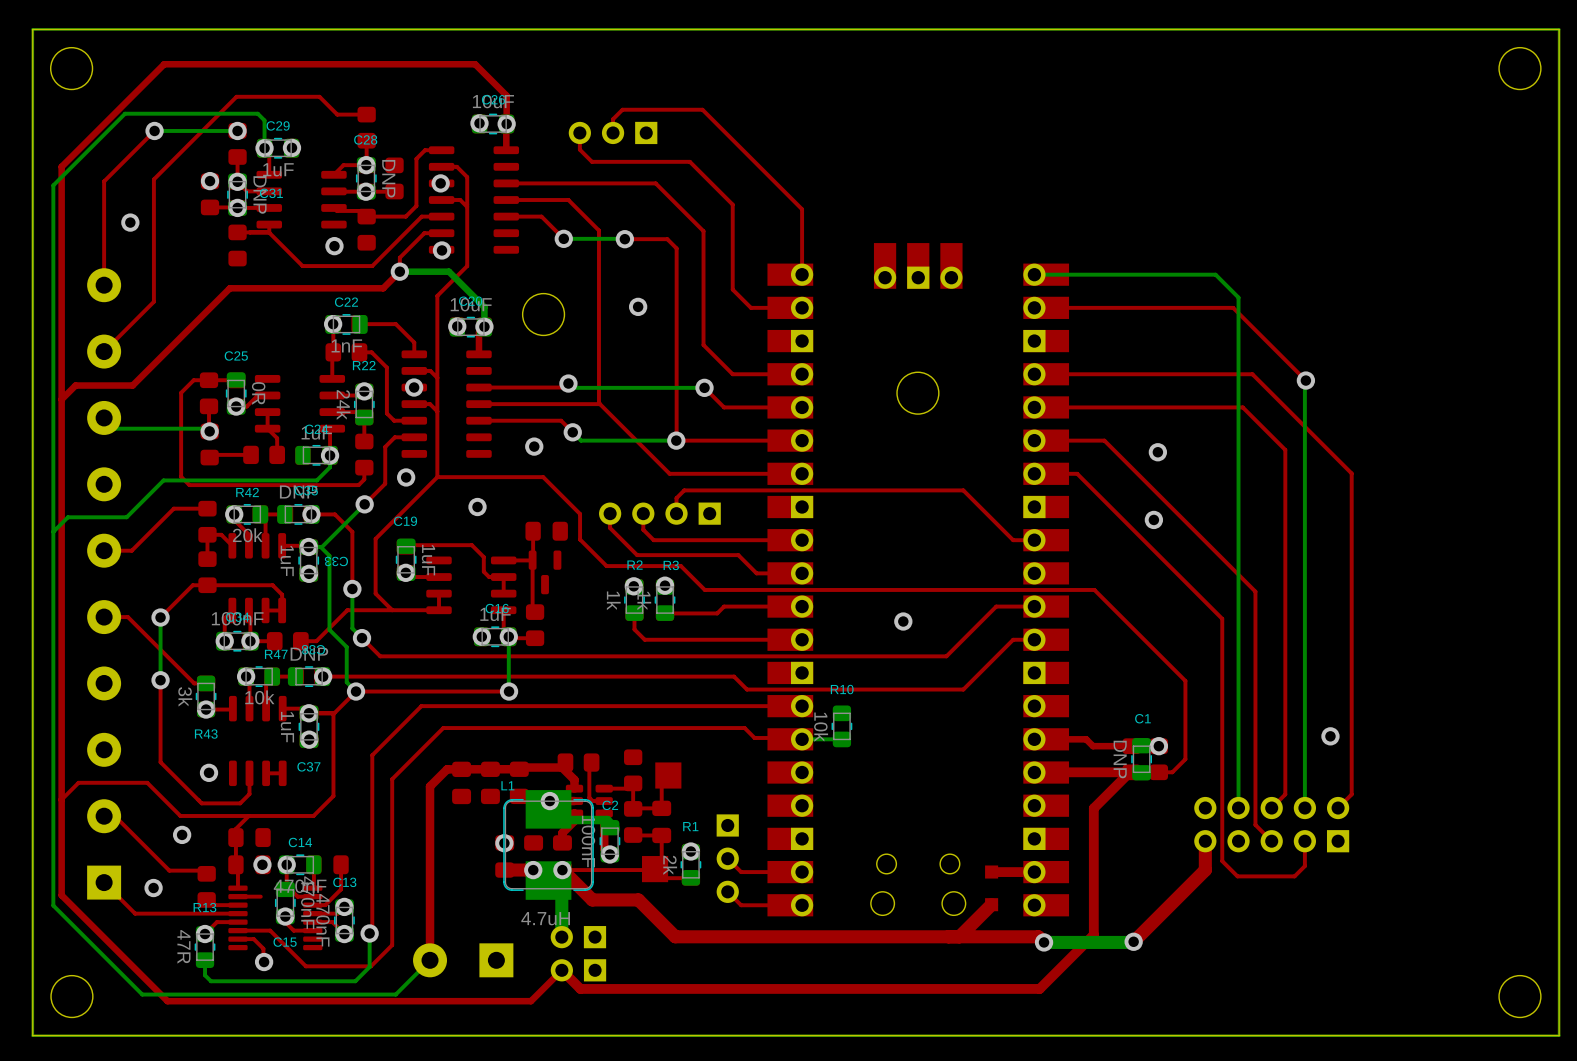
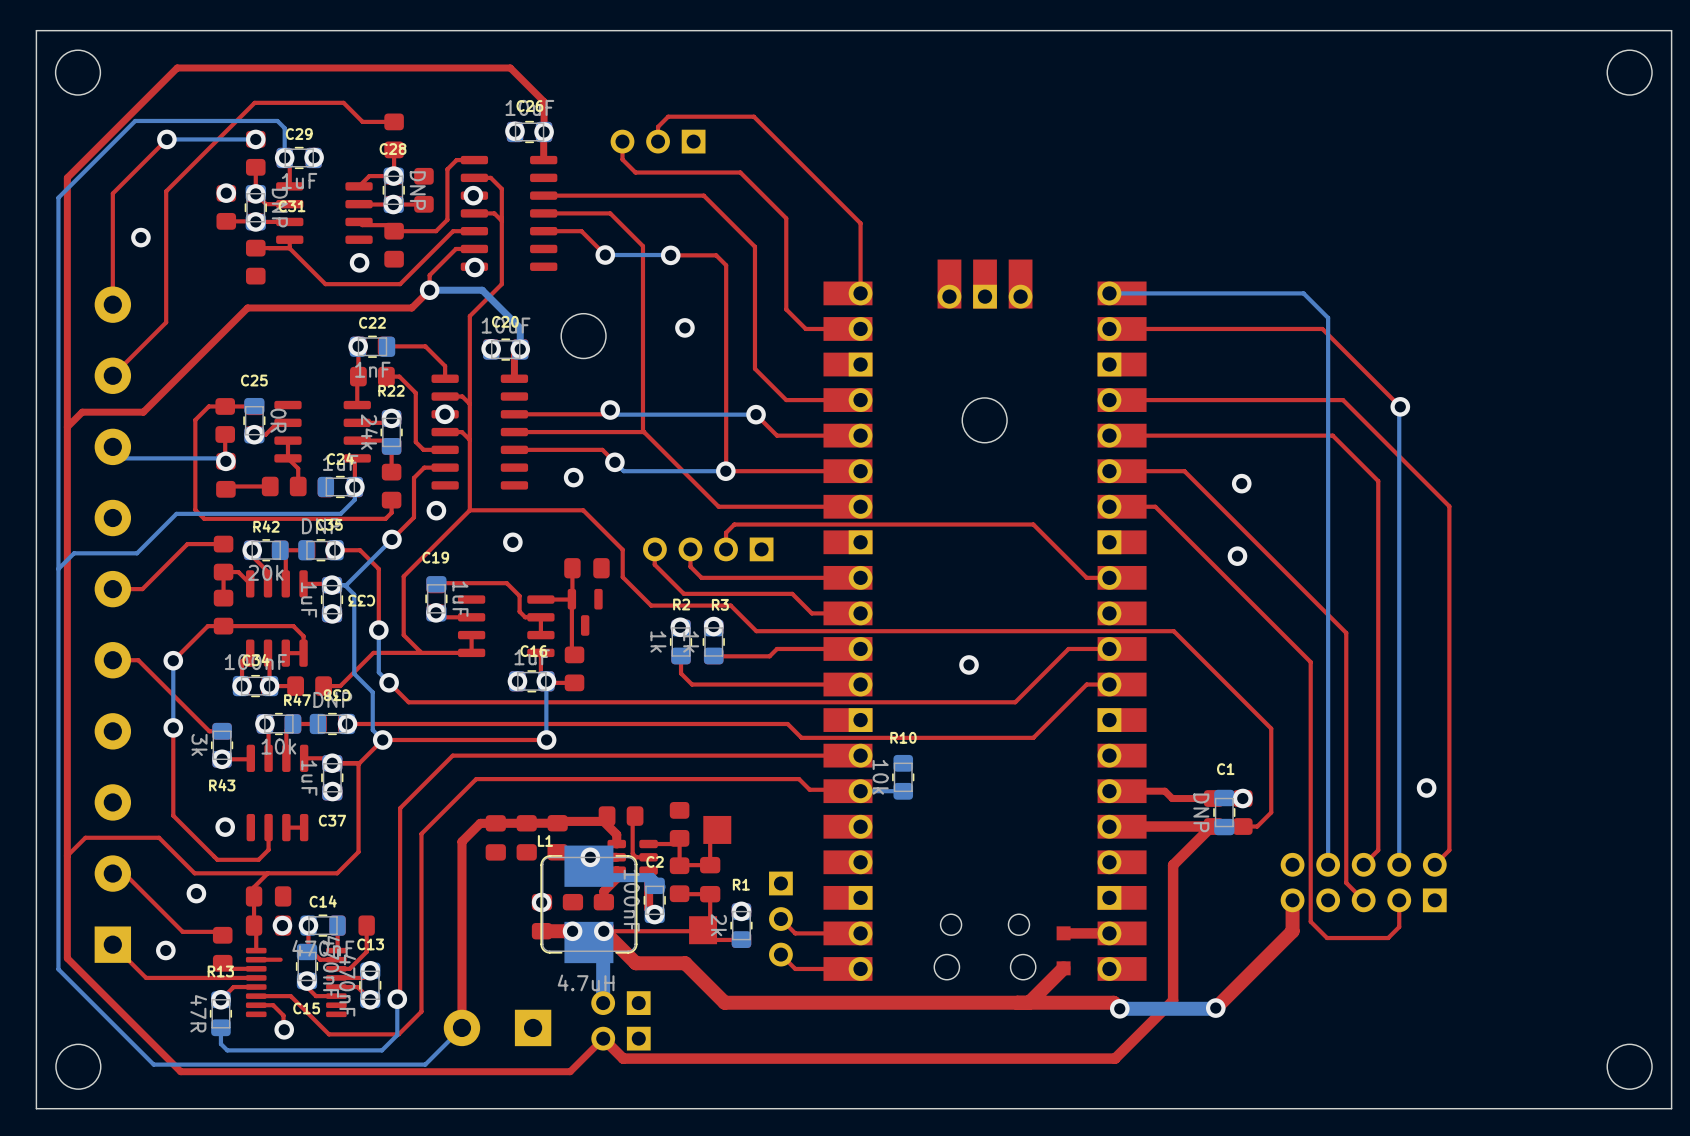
bottom track: (1559, 29) (1559, 1035) (32, 1035) (32, 29) (1559, 29) -> none

